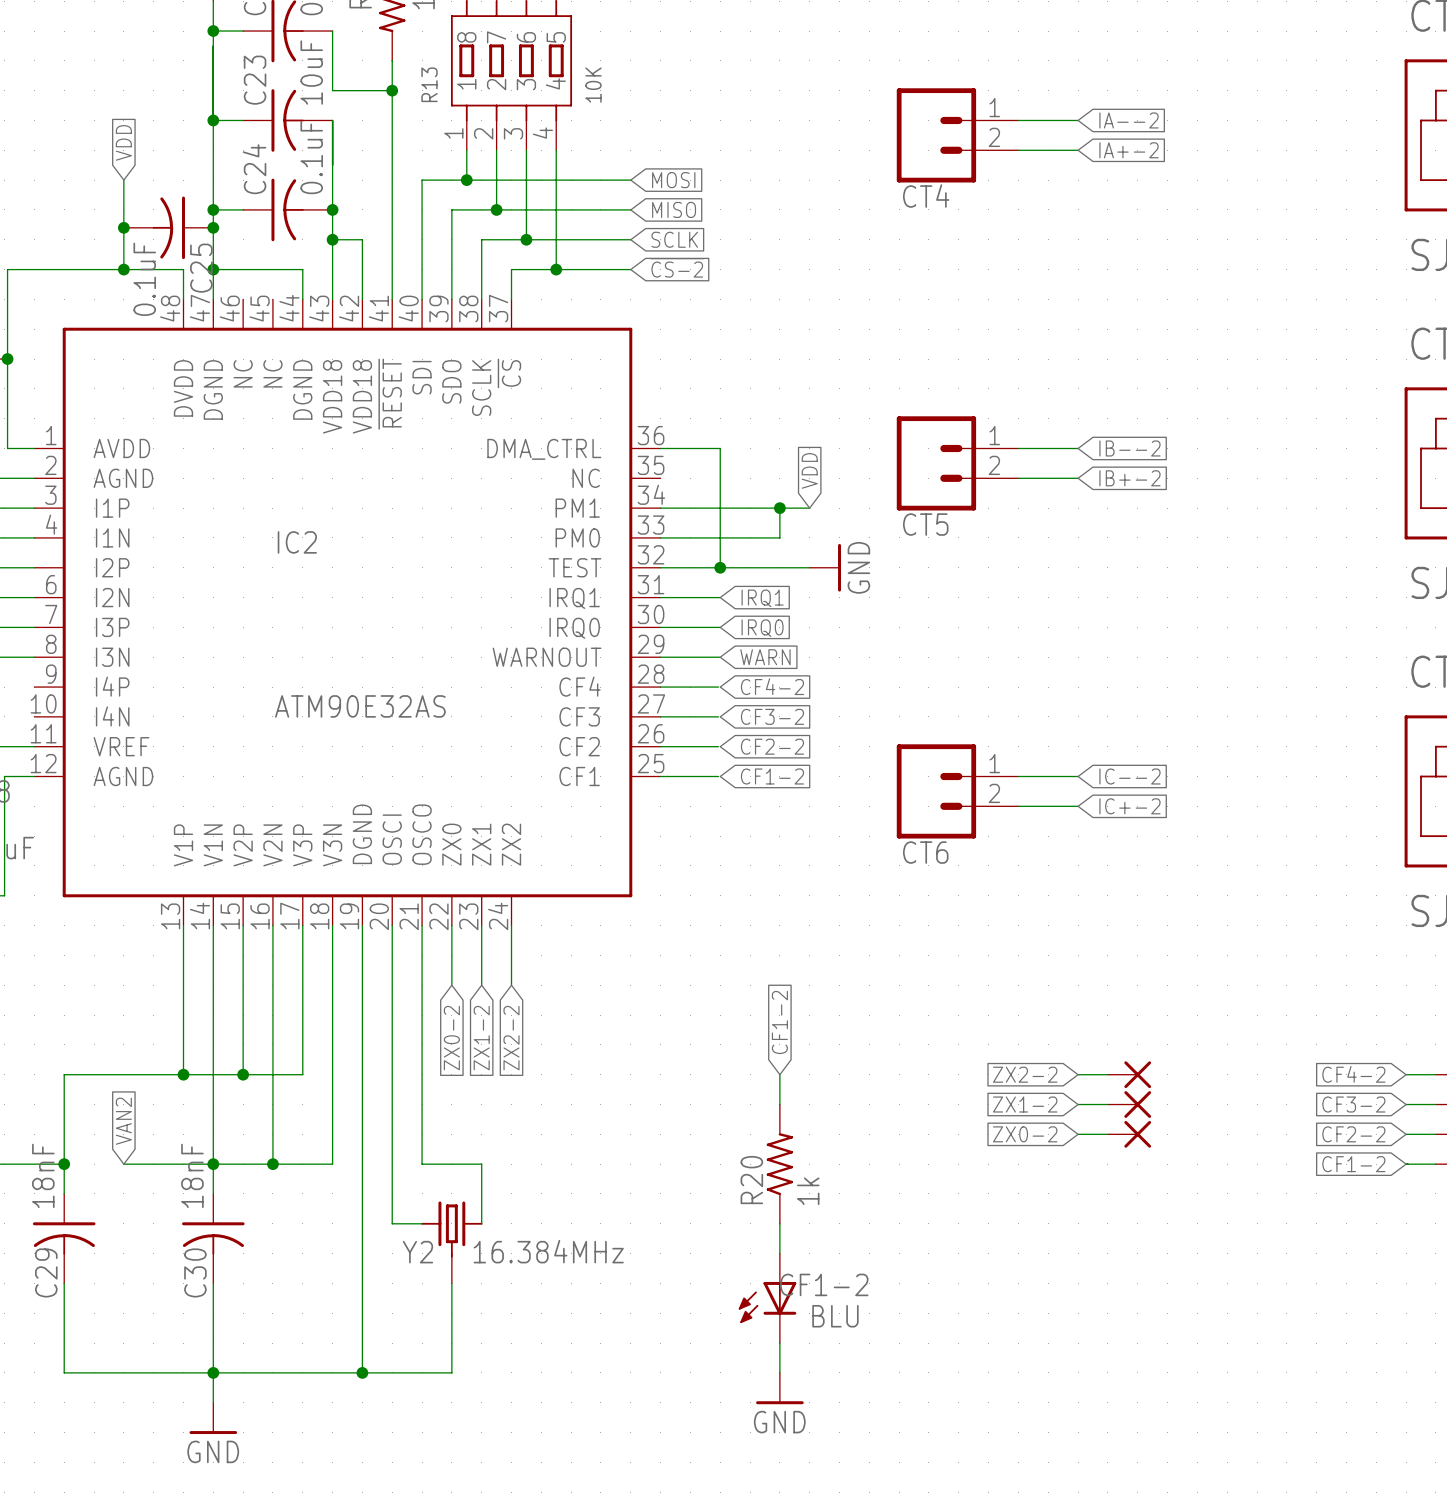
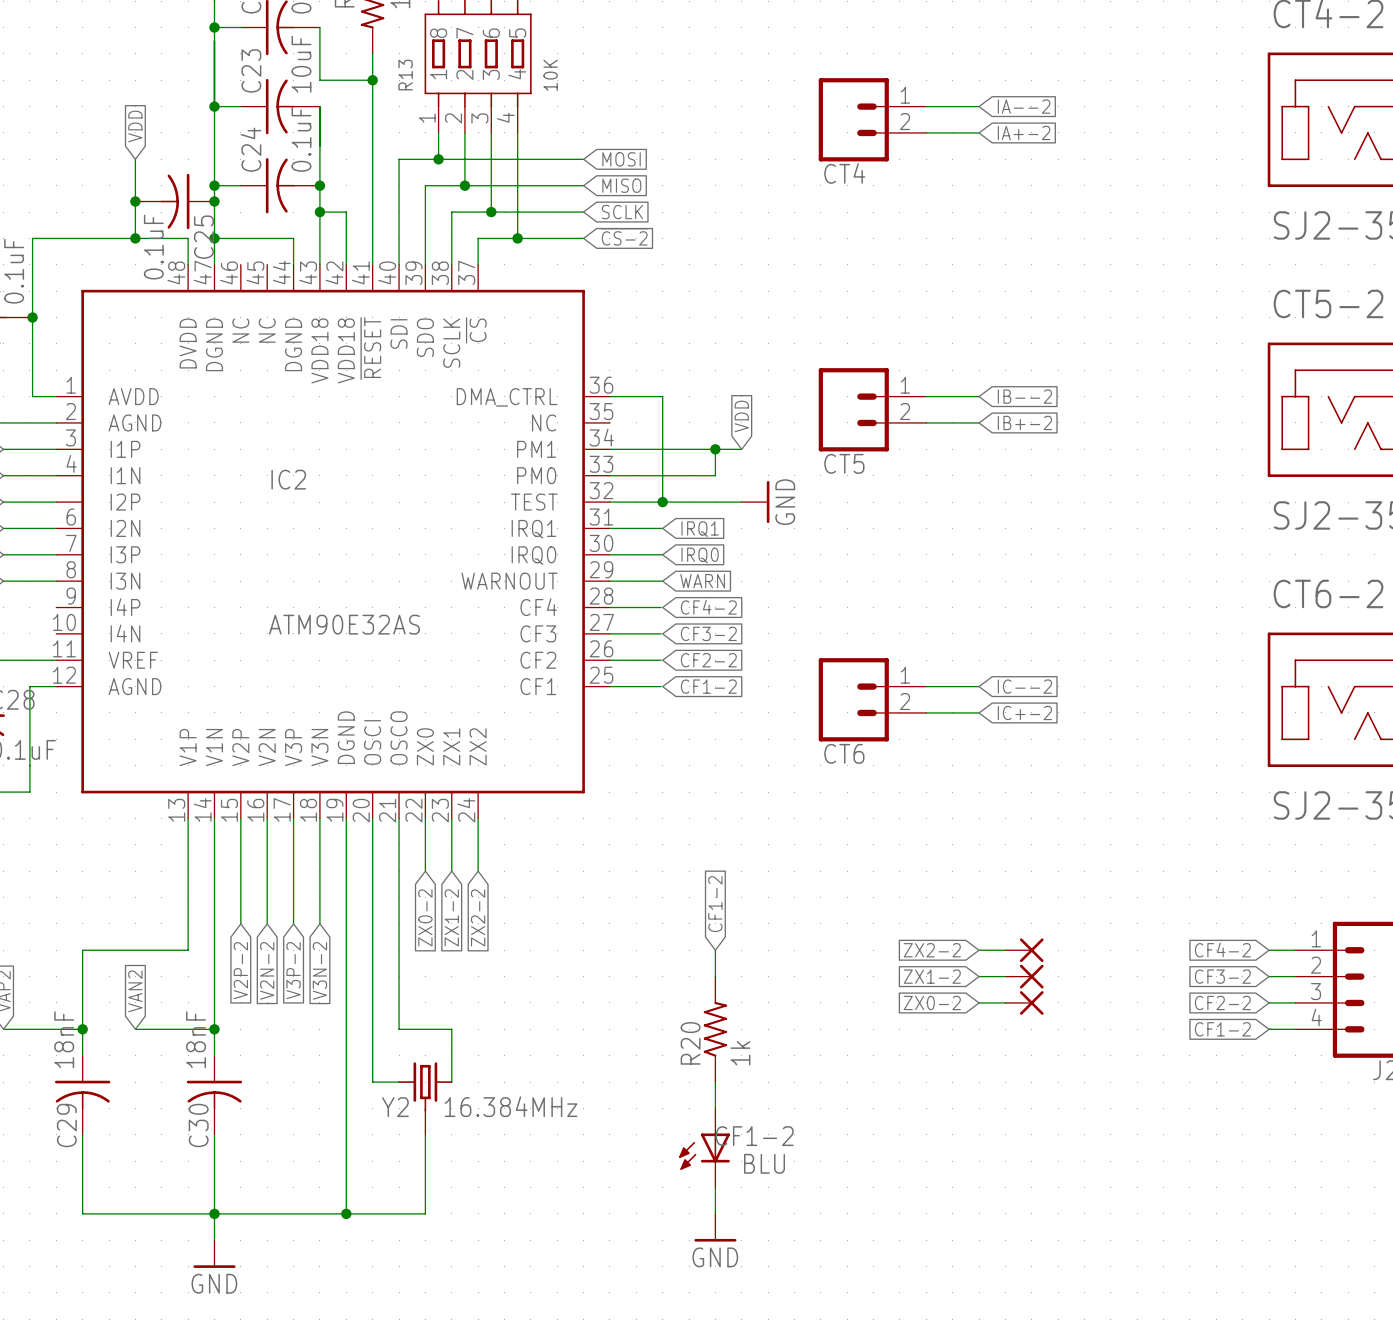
wire: (243, 1044) (243, 1074) -> none
wire: (272, 1044) (272, 1164) -> none
wire: (302, 1044) (302, 1074) (183, 1074) -> none
wire: (332, 1044) (332, 1164) (213, 1164) -> none
junction: (183, 1074) -> none
junction: (243, 1074) -> none
global label: none -> V2P-2 (240, 970)
global label: none -> V3P-2 (293, 970)
global label: none -> V2N-2 (267, 970)
global label: none -> V3N-2 (319, 970)
junction: (272, 1164) -> none

